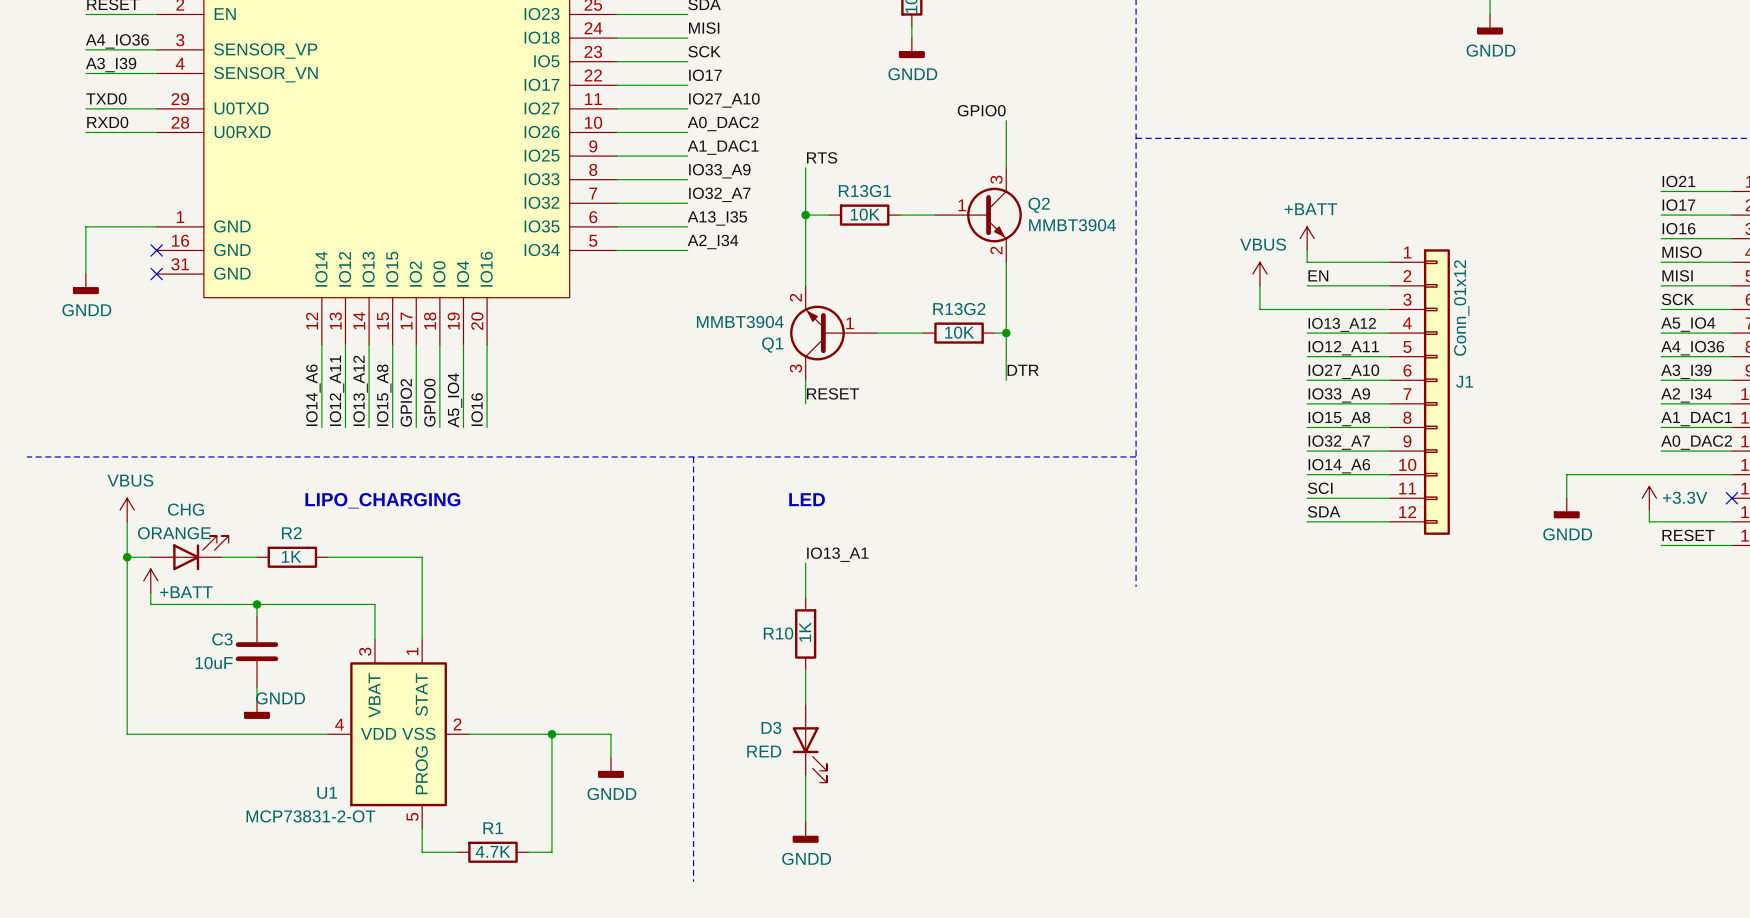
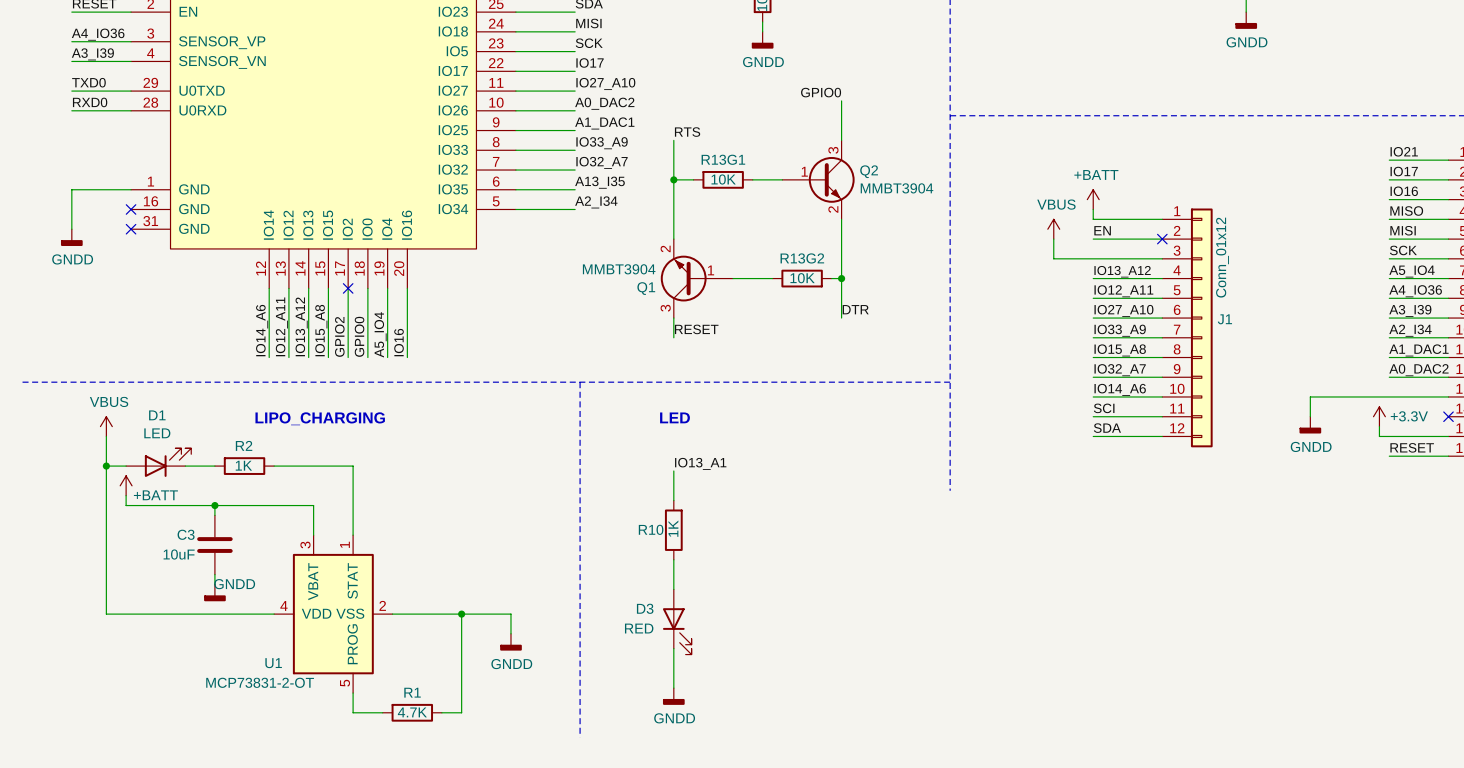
no-connect mark: none -> (1162, 239)
no-connect mark: none -> (348, 288)
CHG name: CHG (185, 509) -> D1 (157, 415)
CHG value: ORANGE (174, 533) -> LED (157, 433)

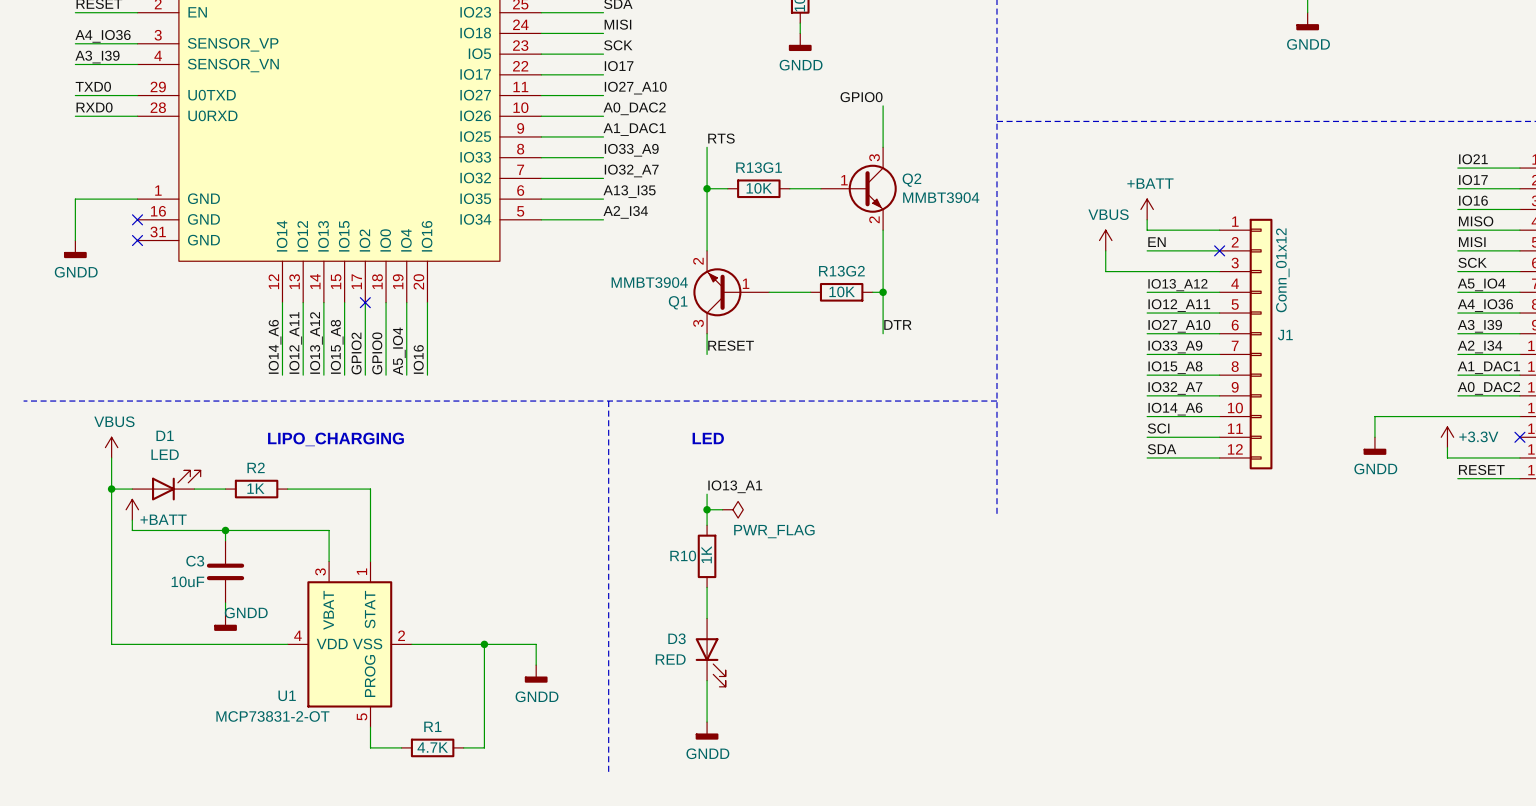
wire: none -> (707, 509) (722, 509)
junction: none -> (707, 509)
power symbol: none -> PWR_FLAG (732, 509)

